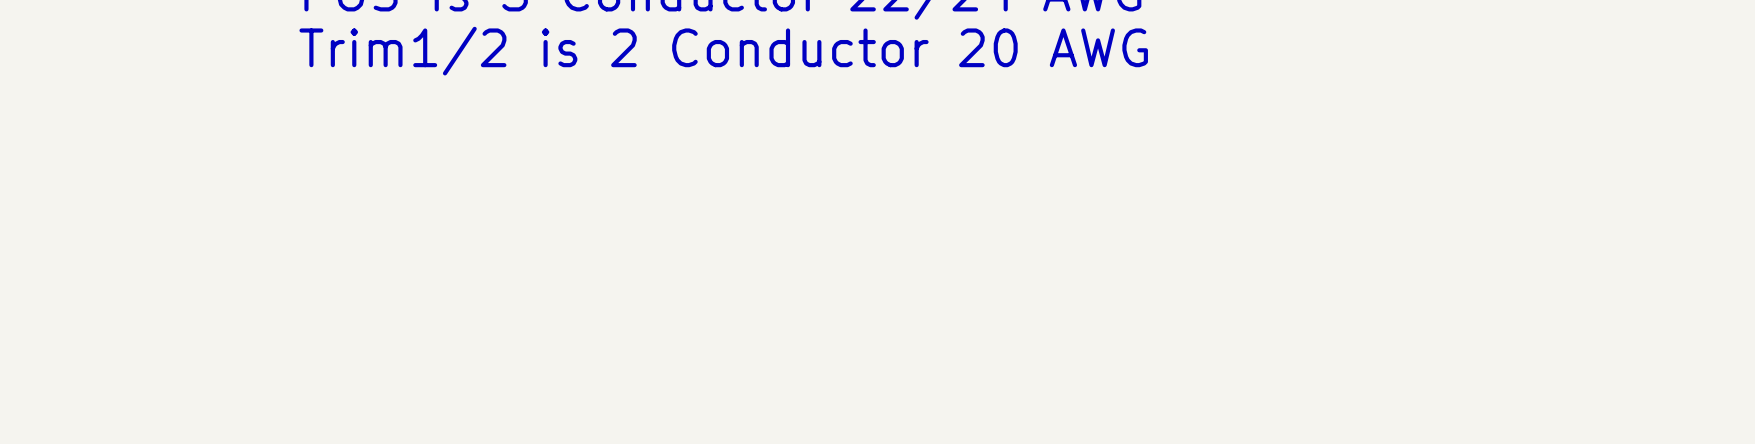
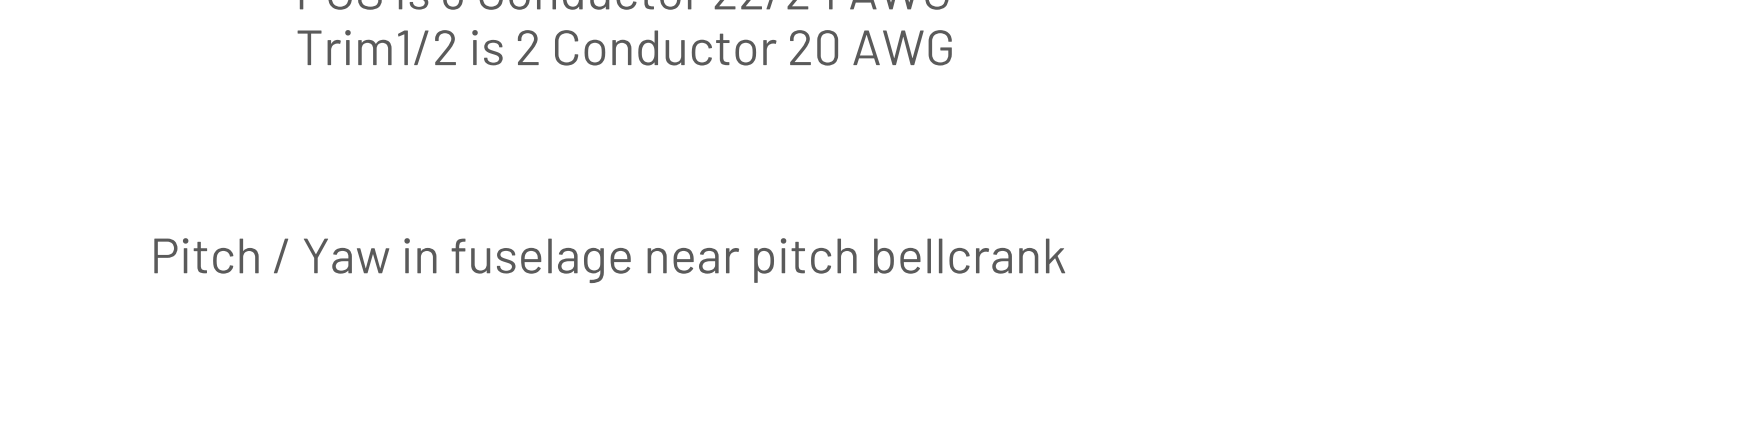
text: none -> Pitch / Yaw in fuselage near pitch bellcrank (609, 260)

